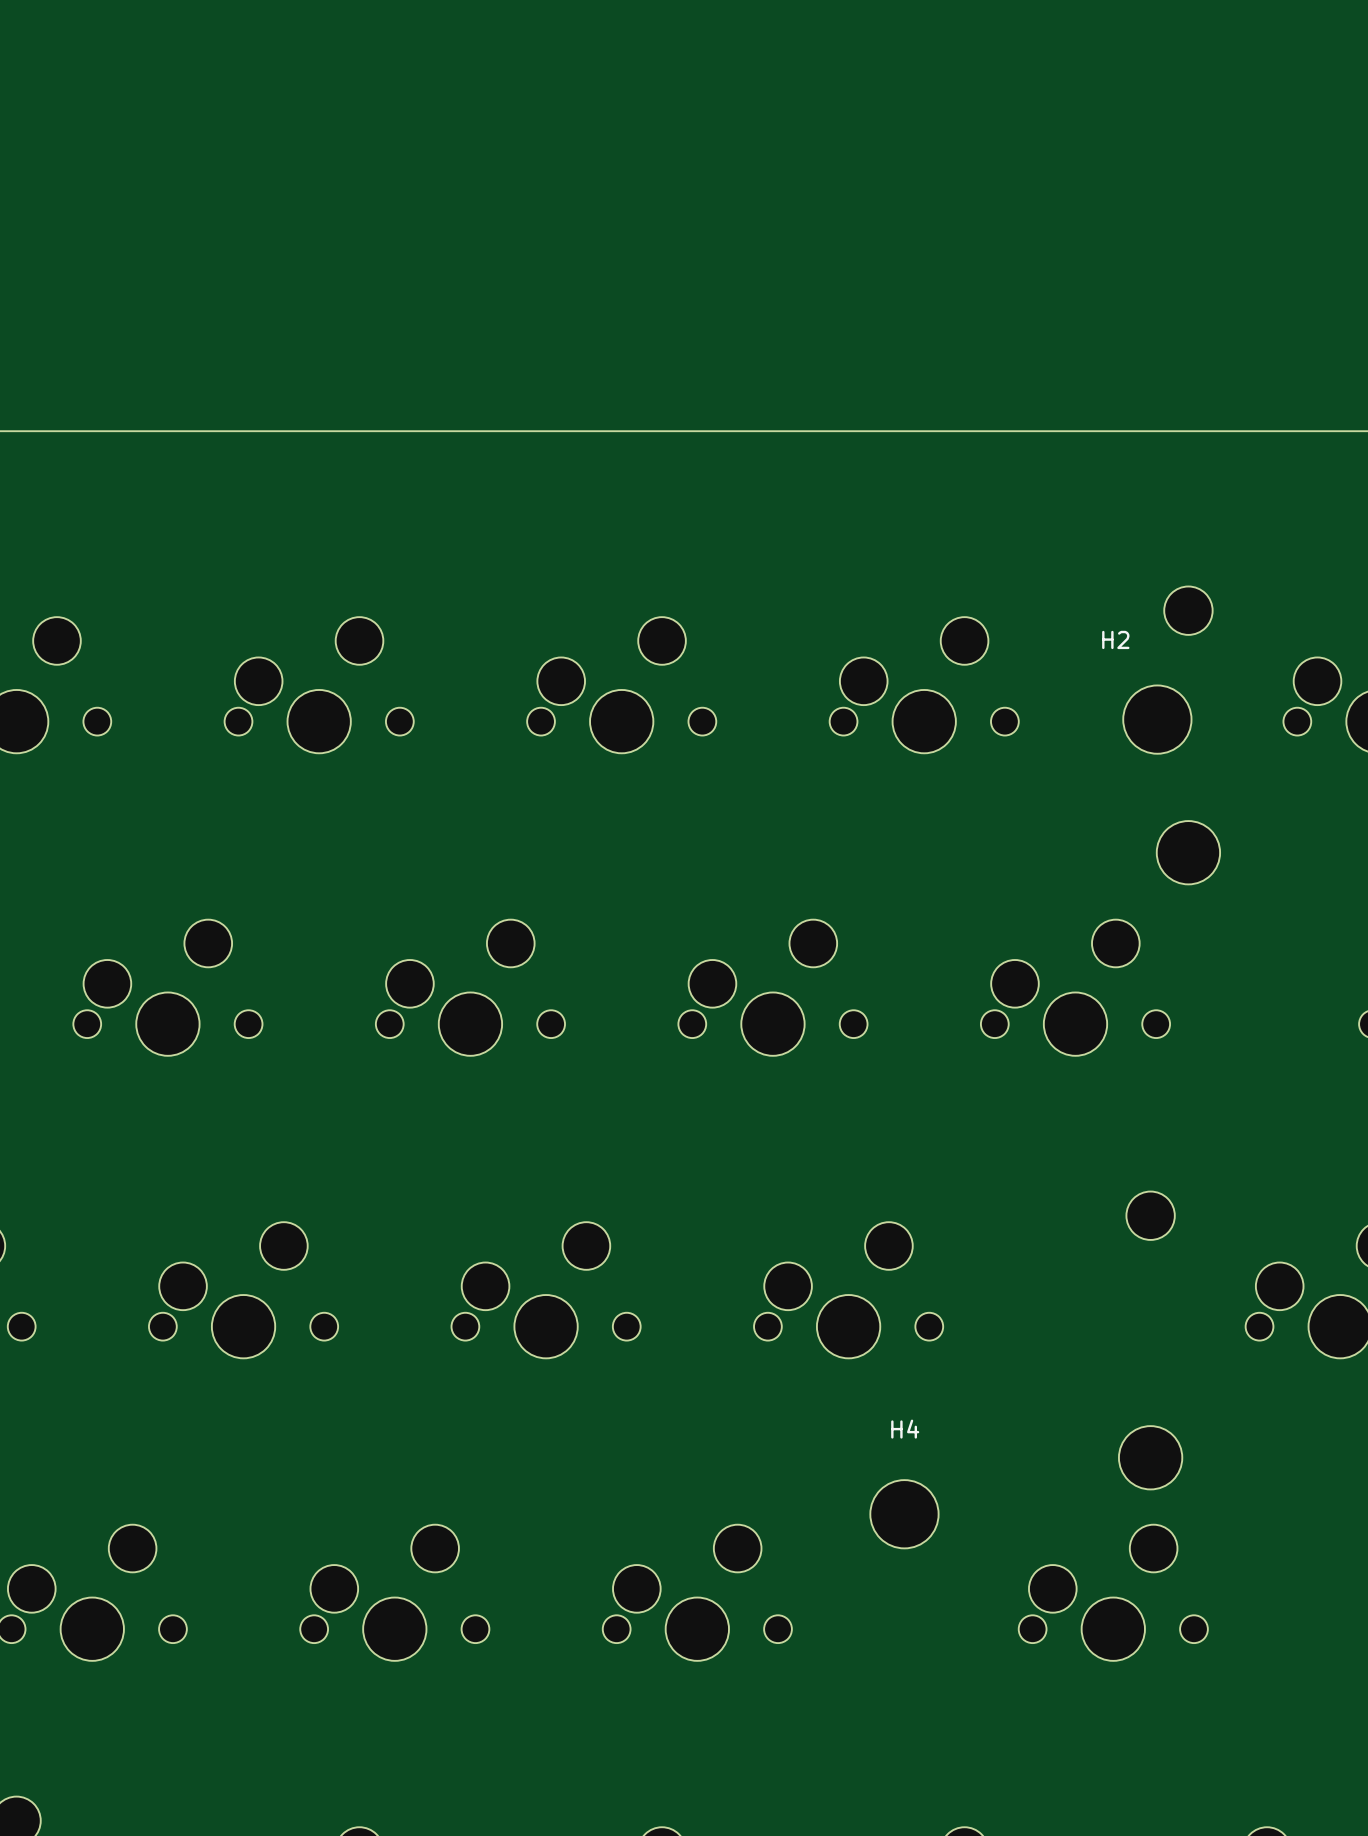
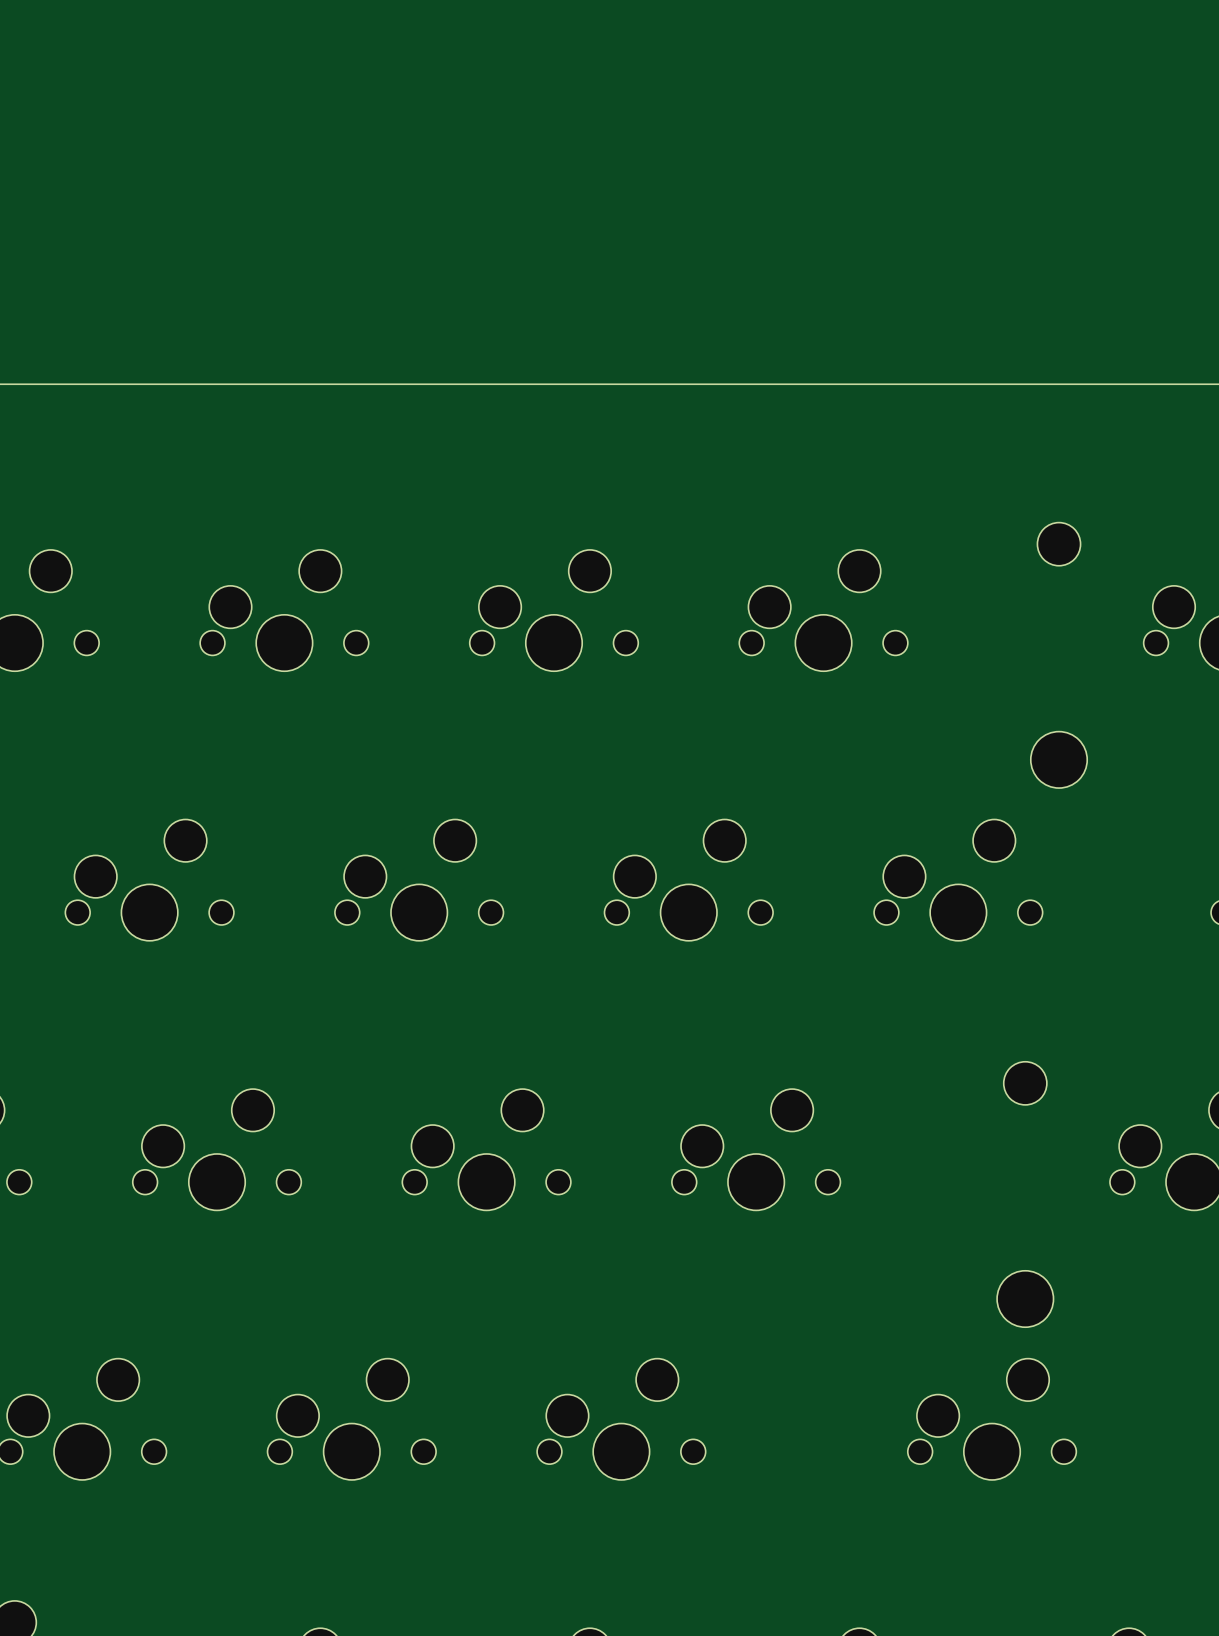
H2: (1157, 719) -> none
H4: (904, 1514) -> none

